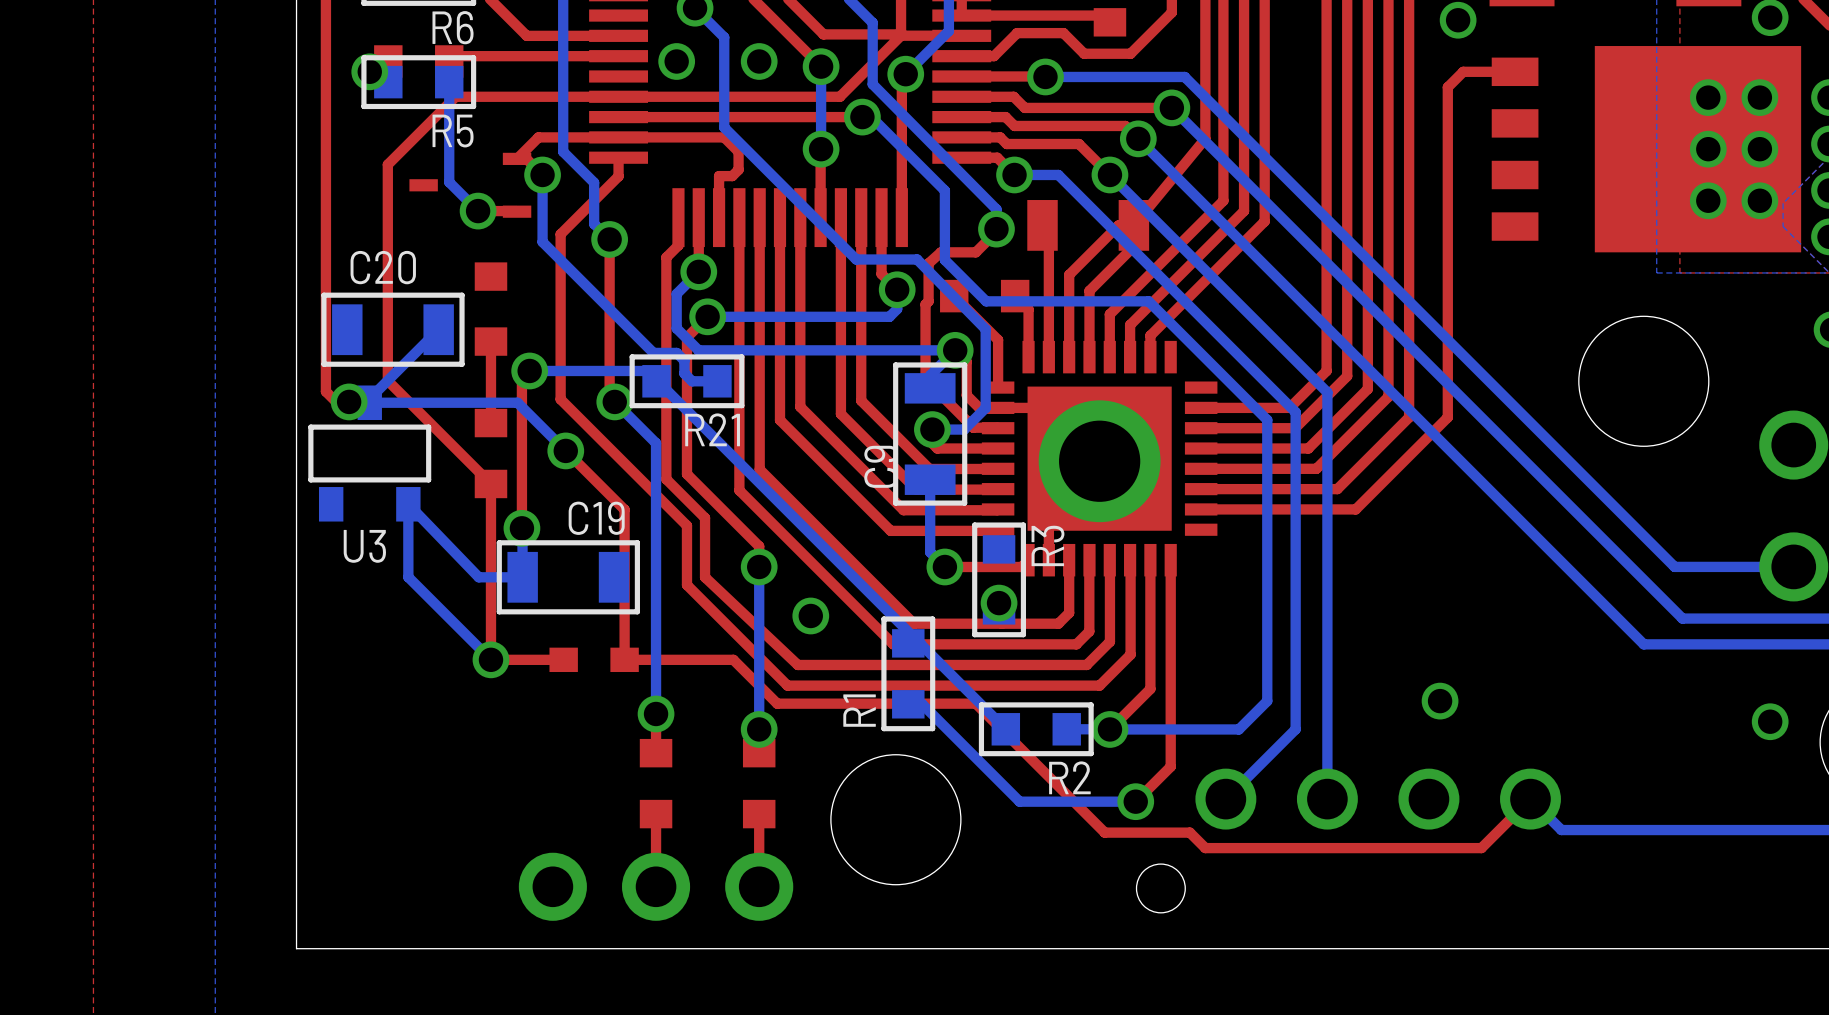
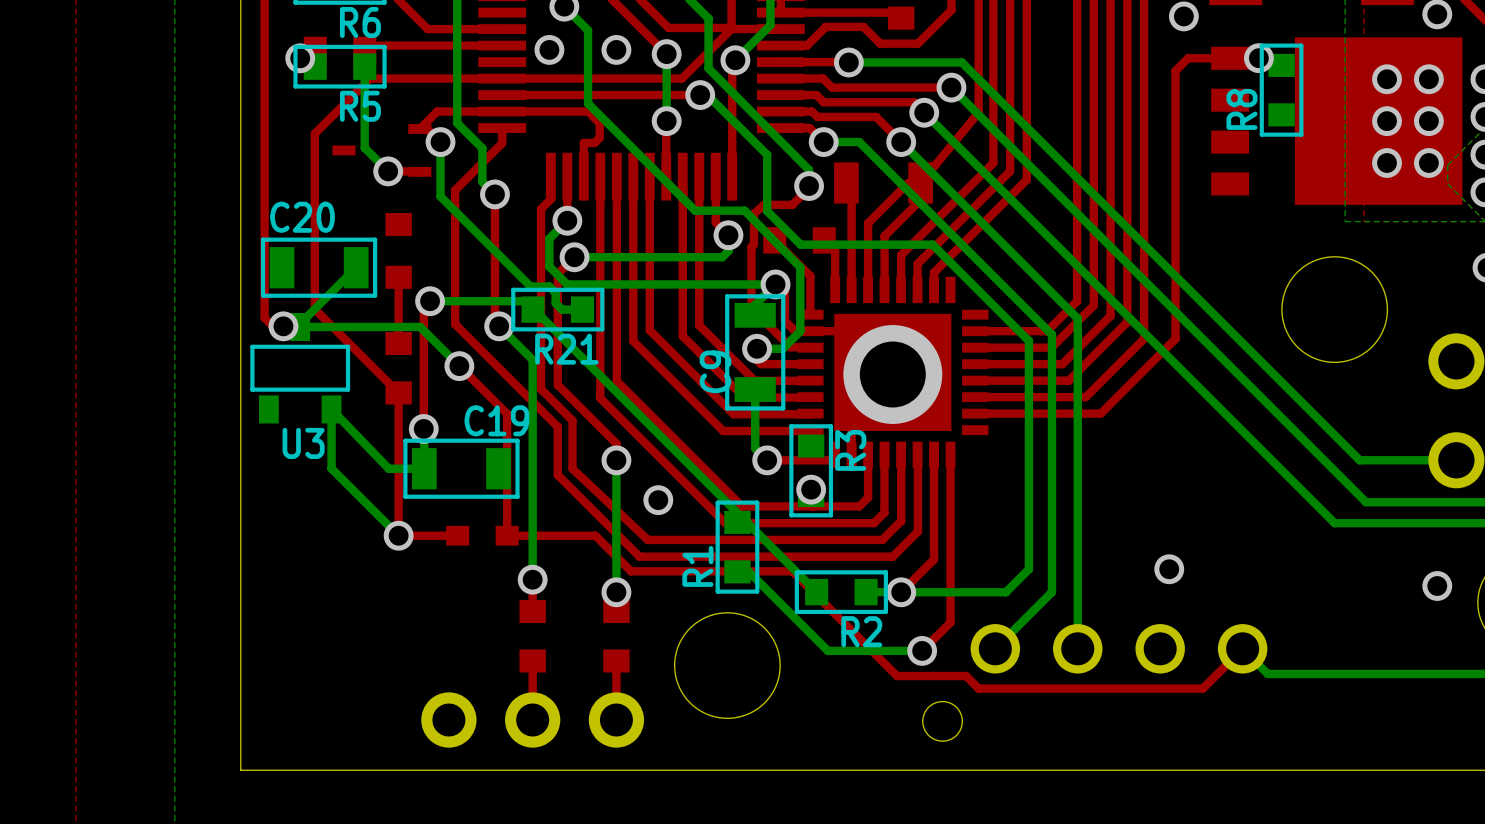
via: none -> (1258, 58)
R8: none -> (1281, 90)

